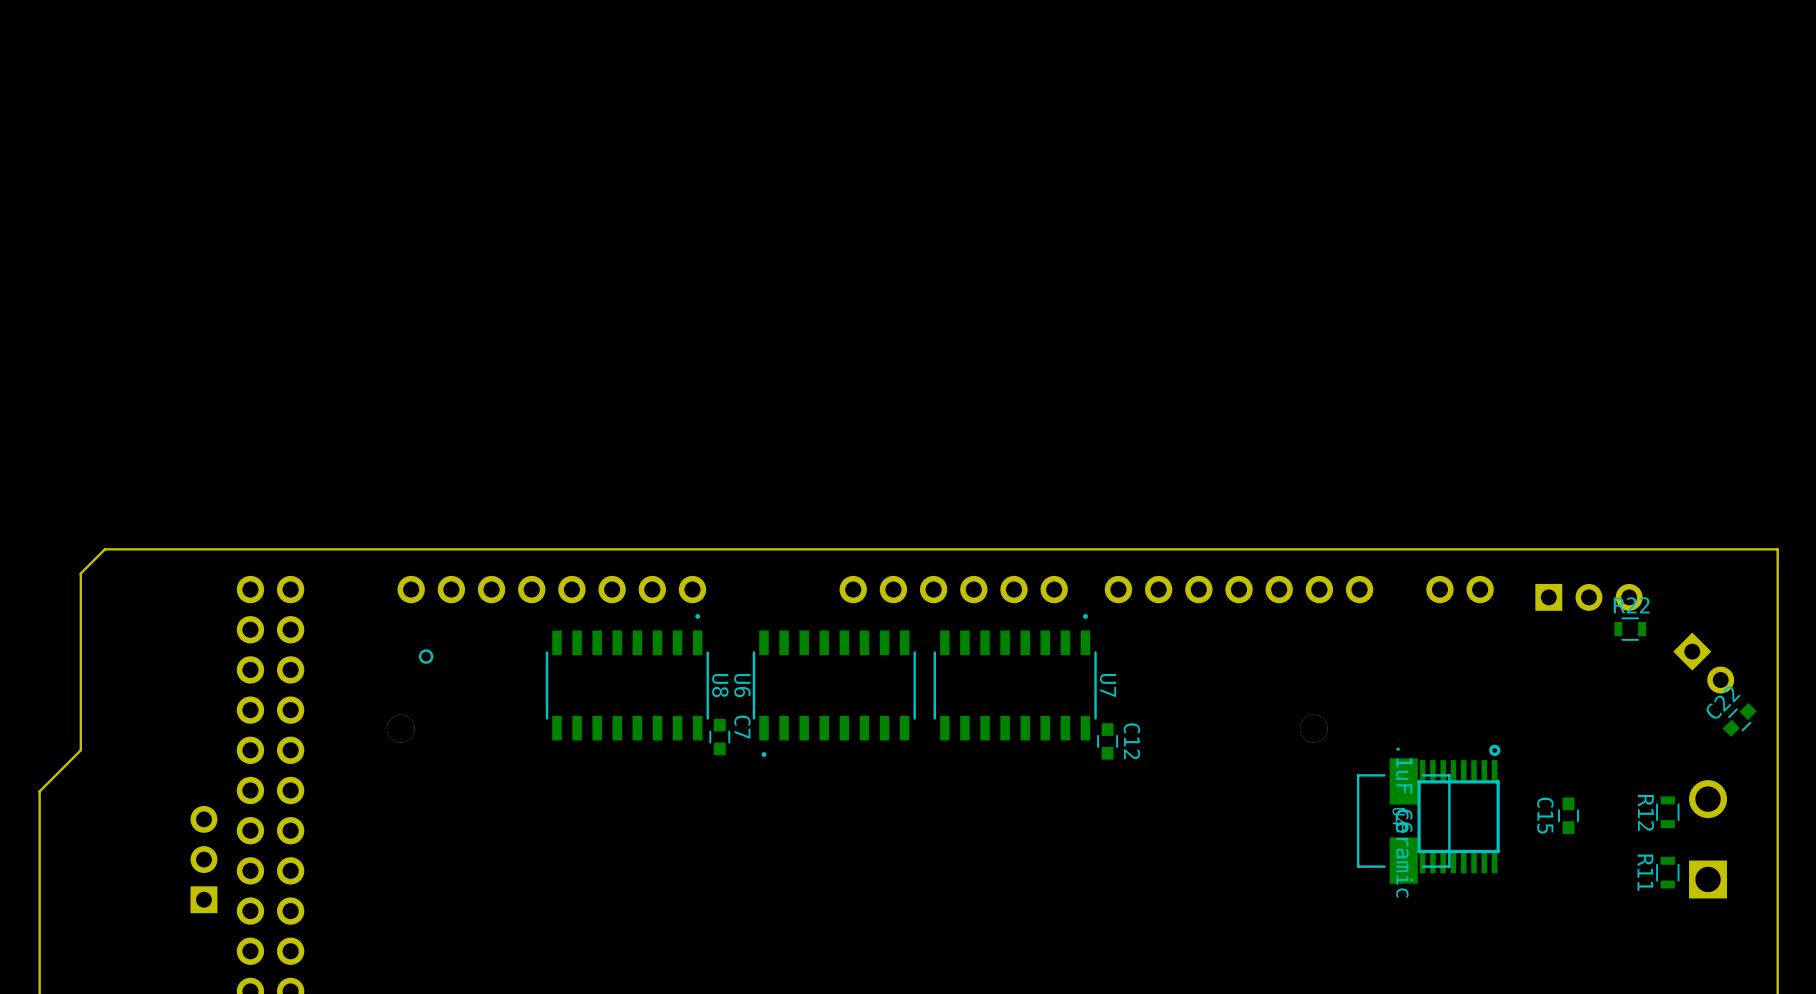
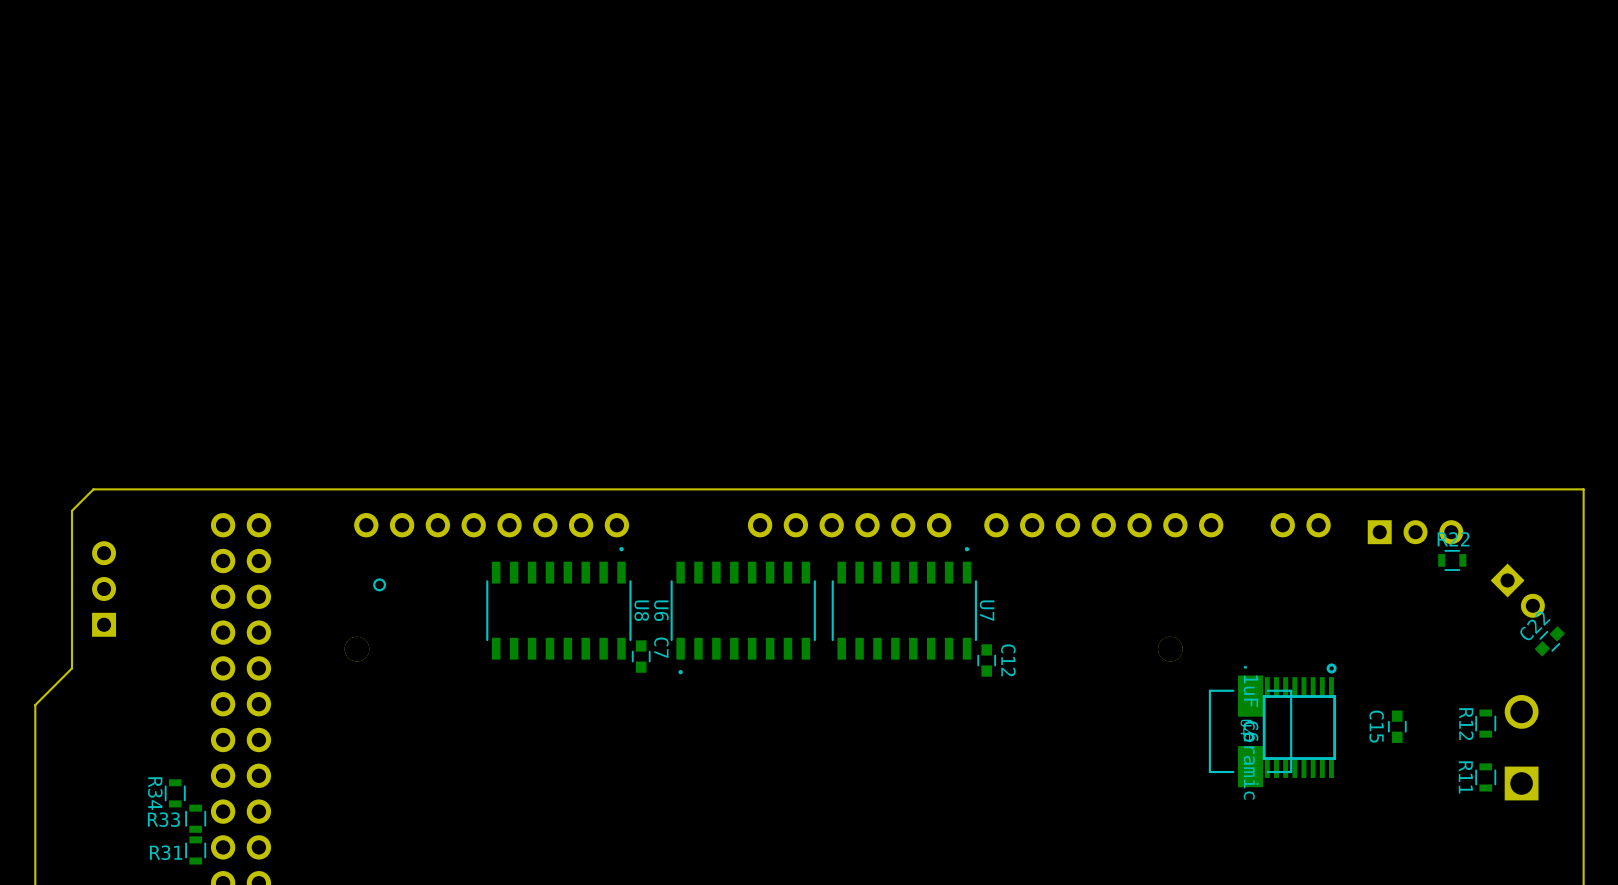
part position: (203, 859) -> (104, 588)
R34: none -> (175, 793)
R33: none -> (195, 818)
R31: none -> (195, 850)

